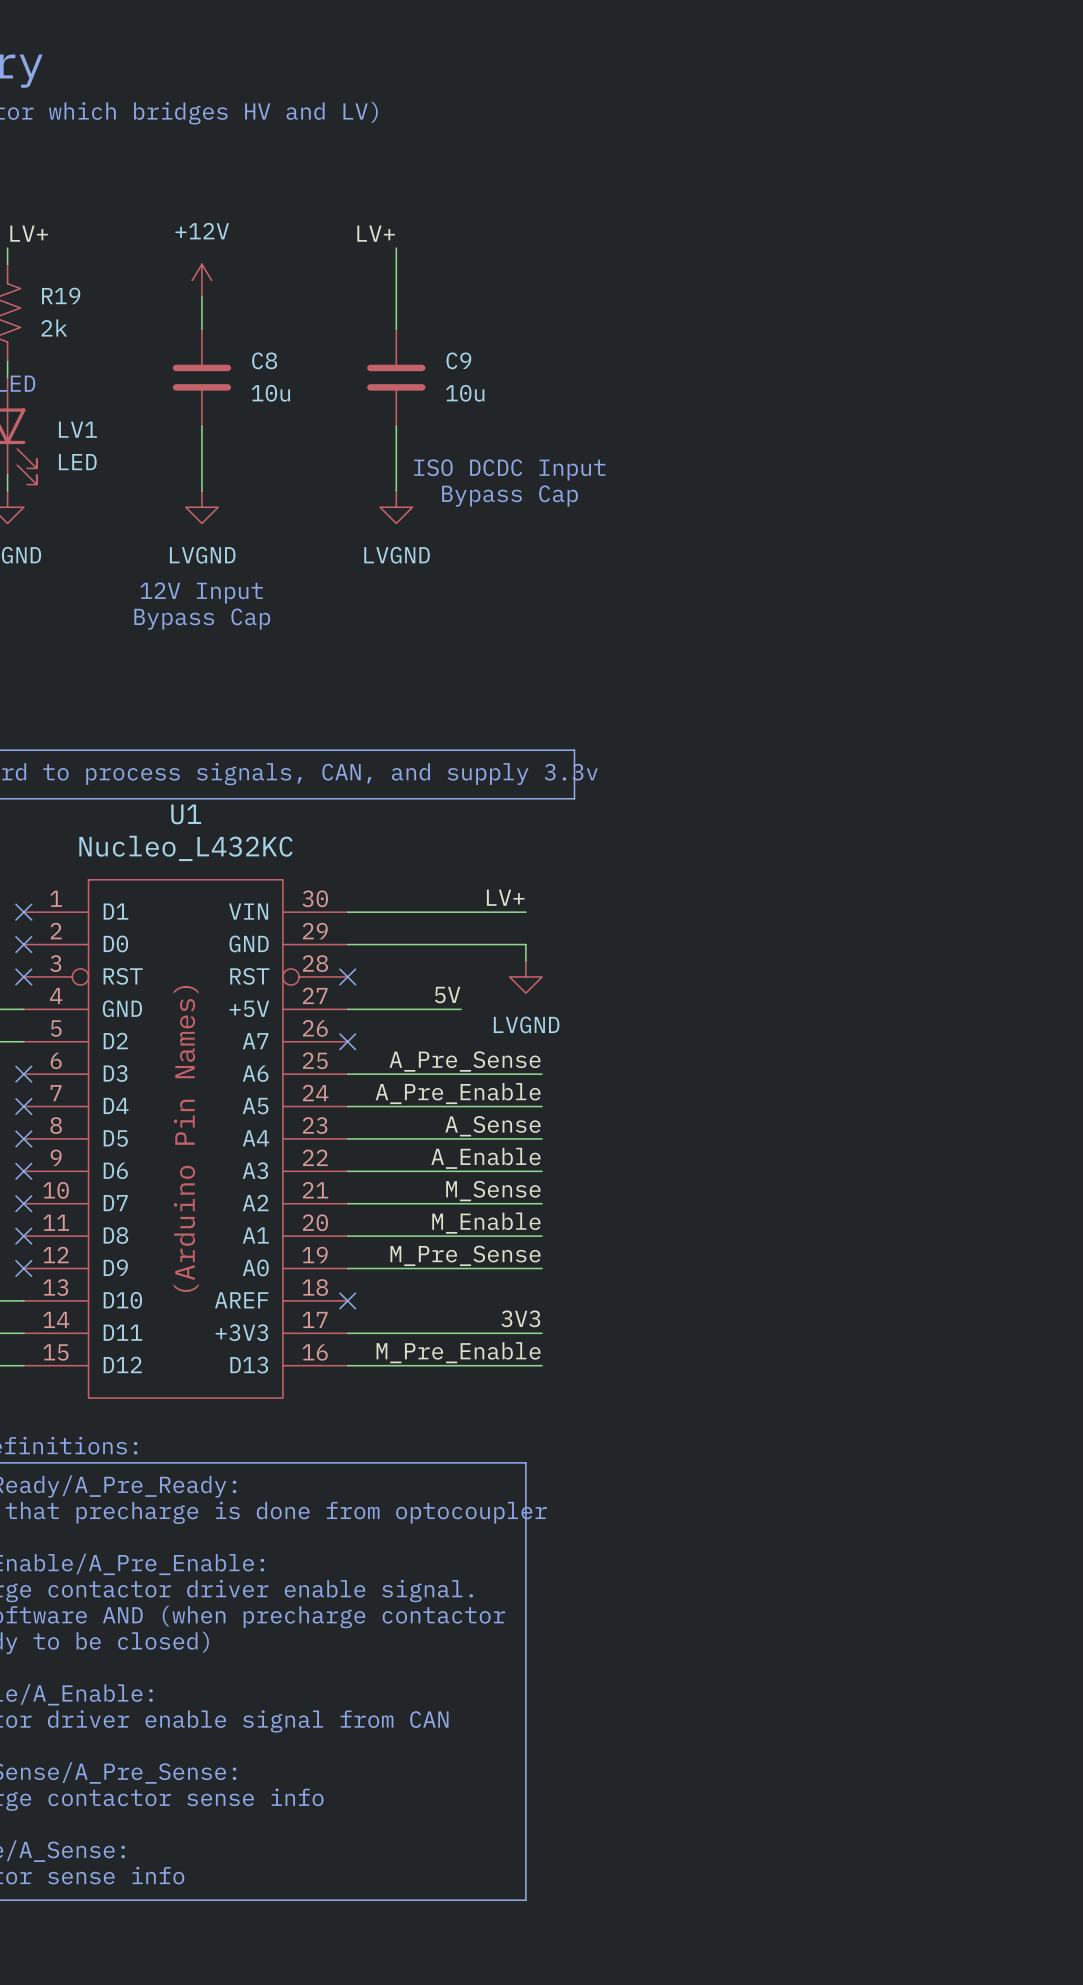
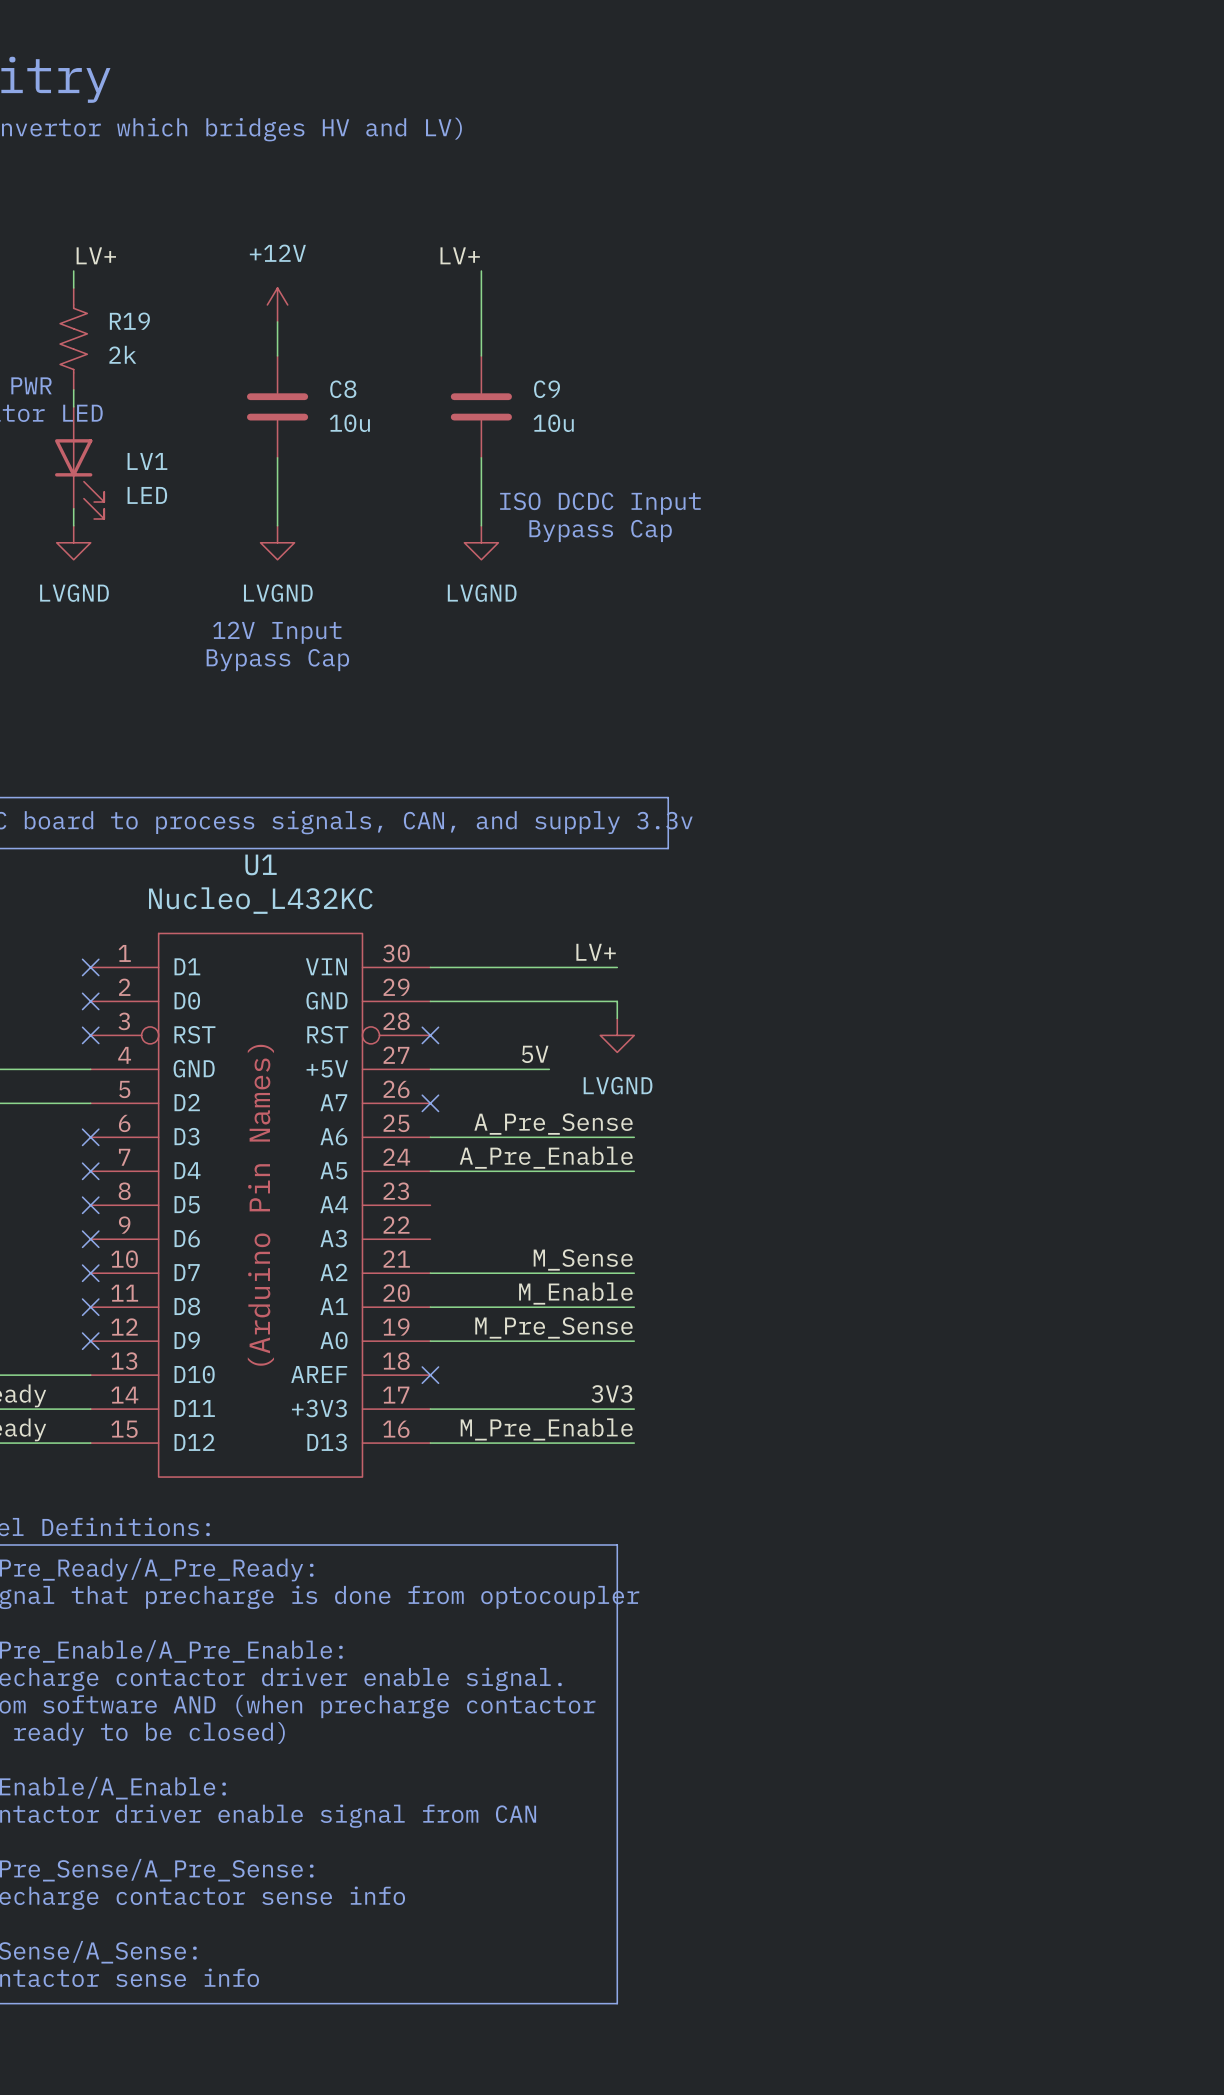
label: A_Sense (492, 1126) -> none
wire: (347, 1138) (542, 1138) -> none
label: A_Enable (485, 1158) -> none
wire: (347, 1171) (542, 1171) -> none

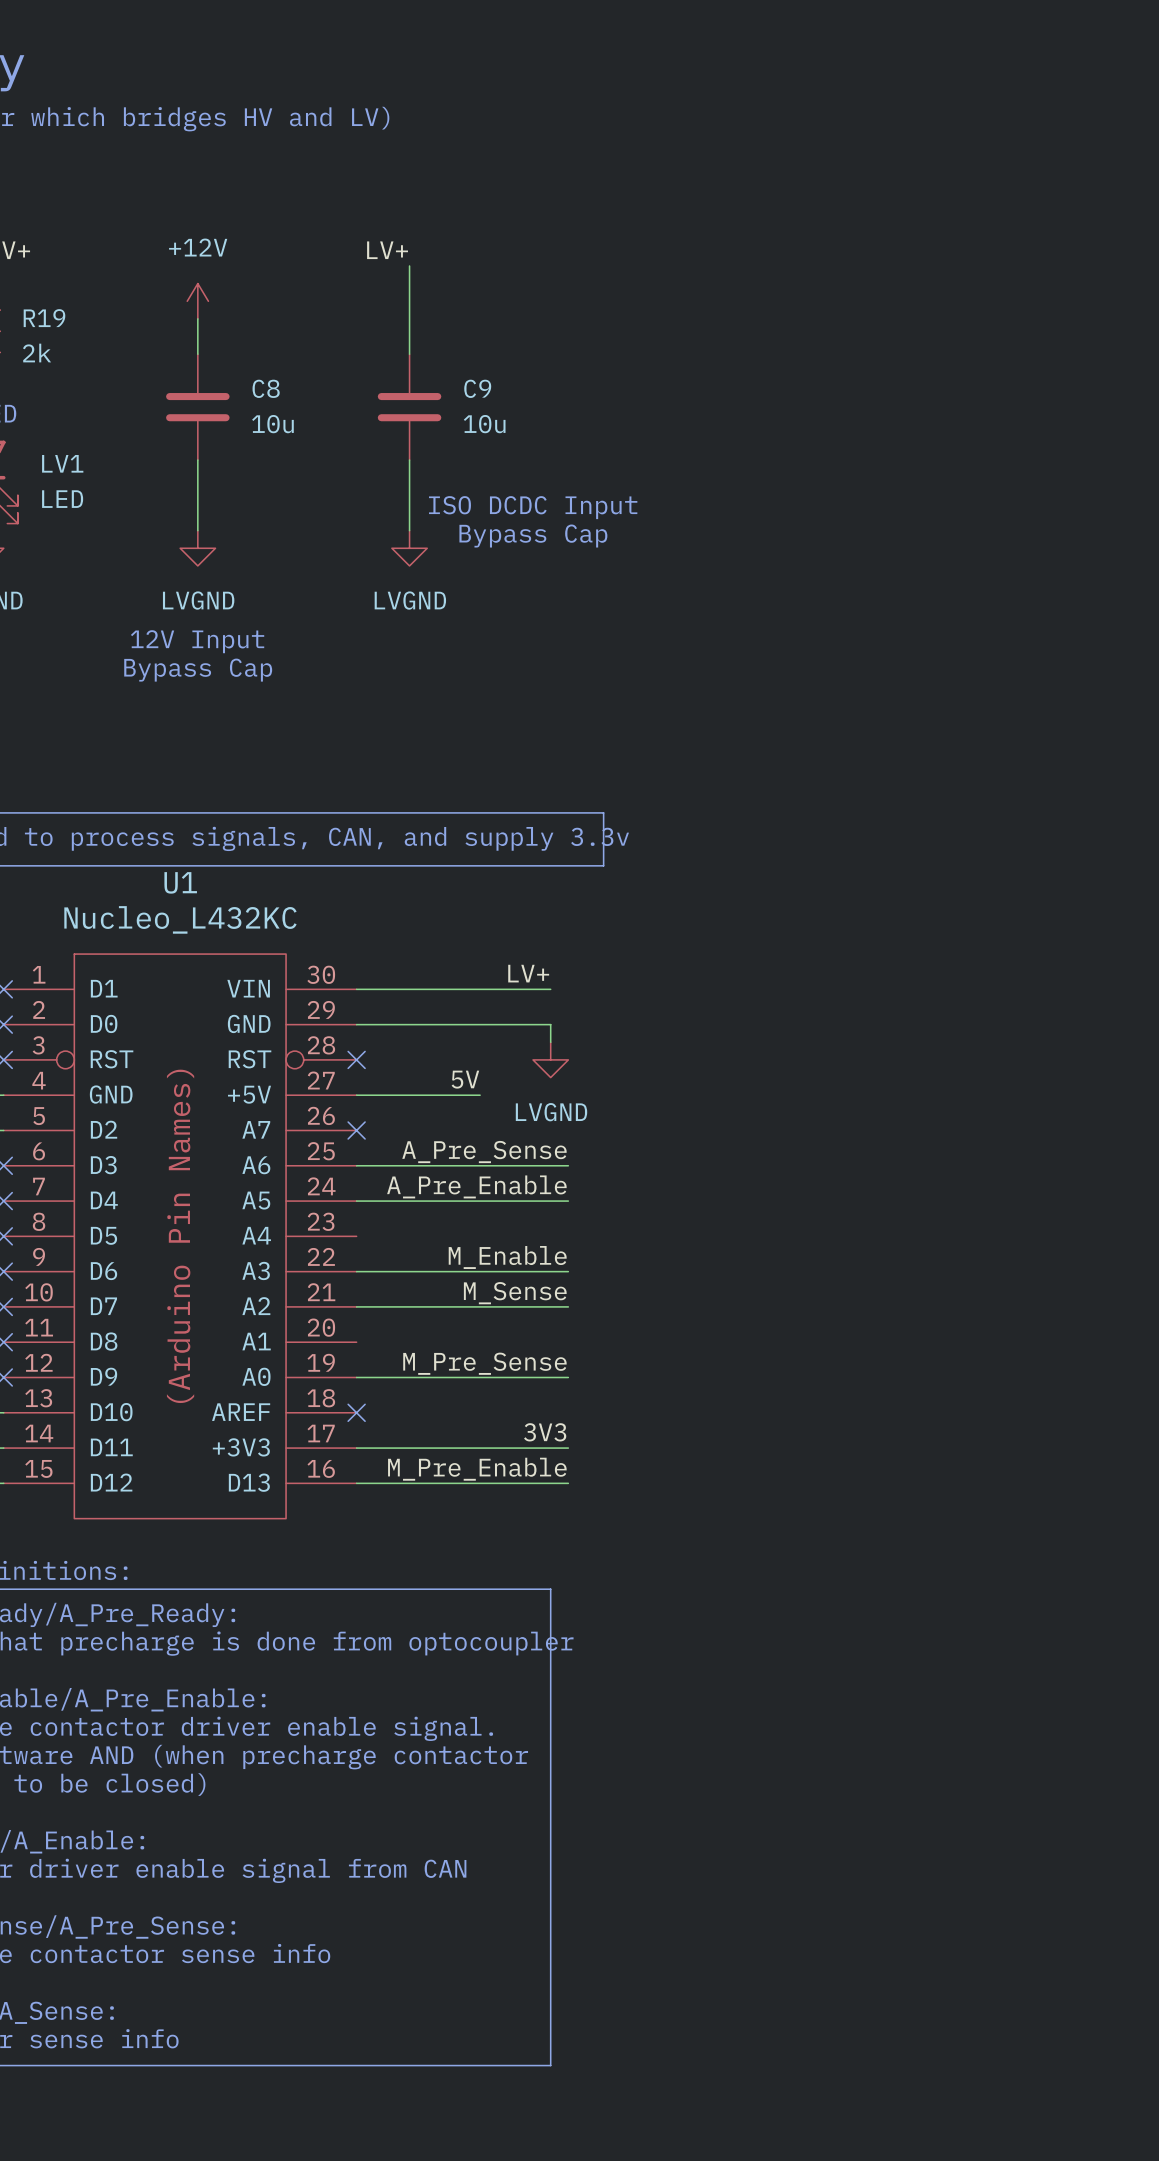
label position: M_Enable (575, 1293) -> M_Enable (507, 1257)
wire: (430, 1307) (634, 1307) -> (356, 1271) (568, 1271)

